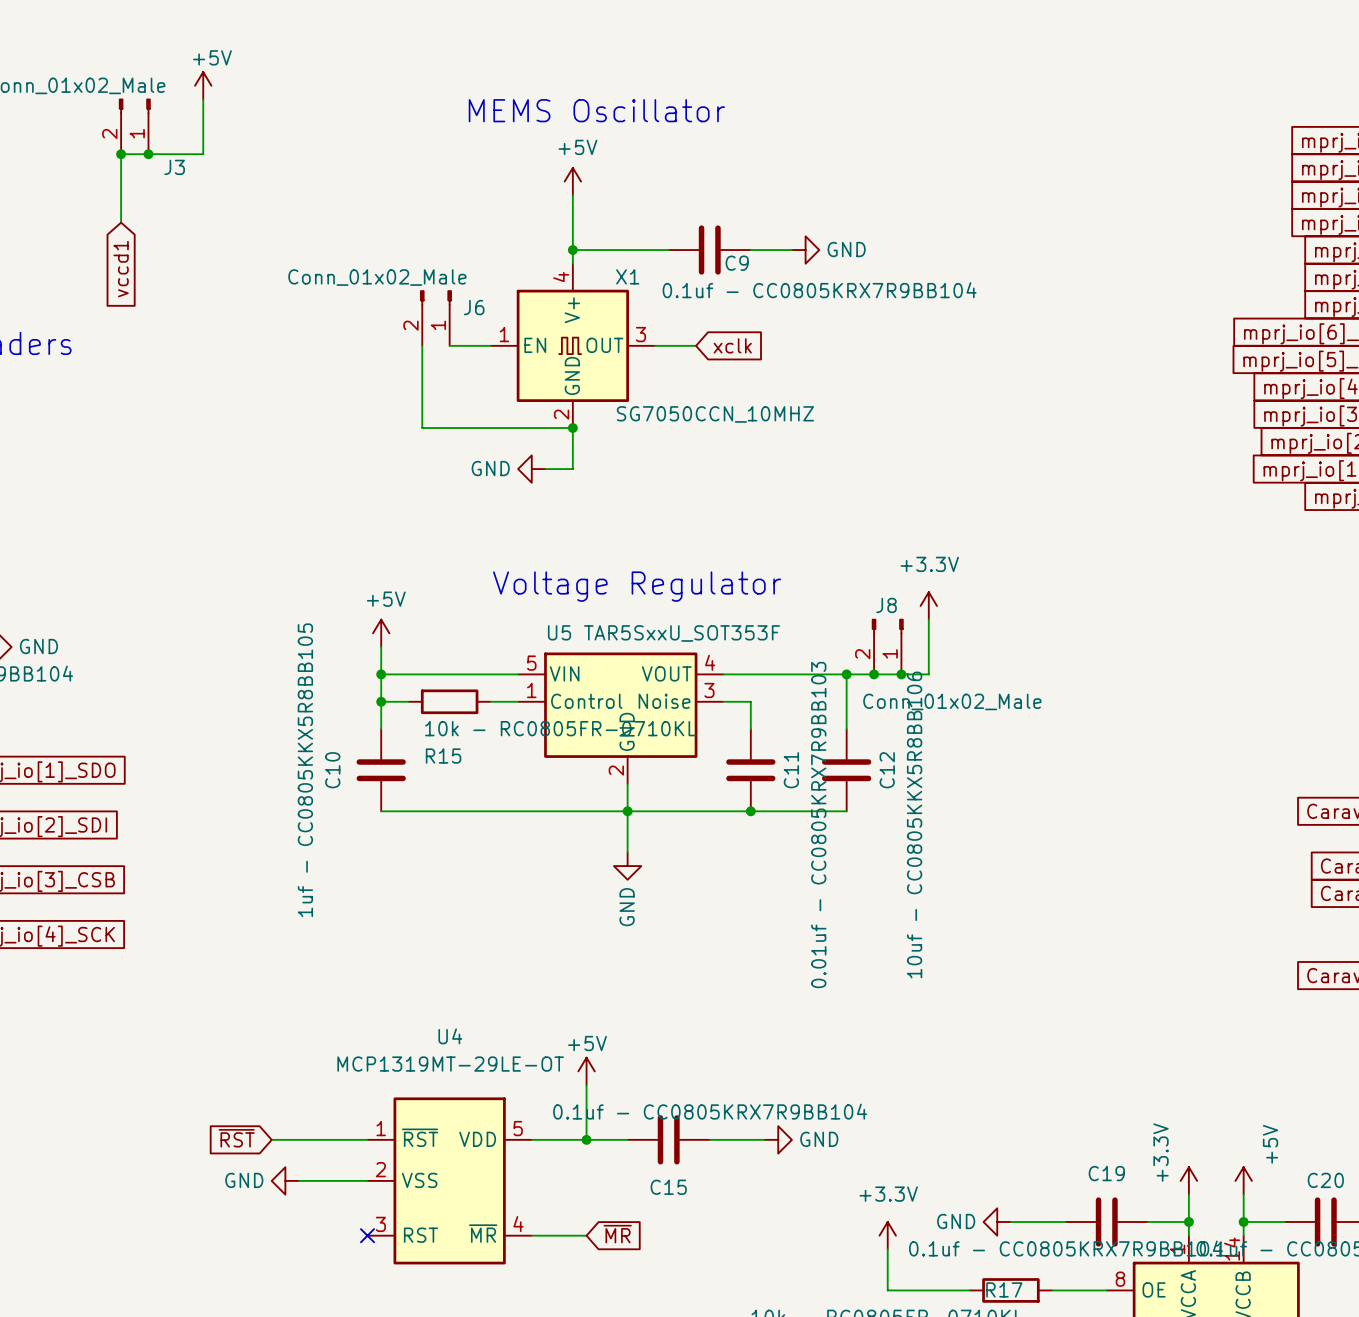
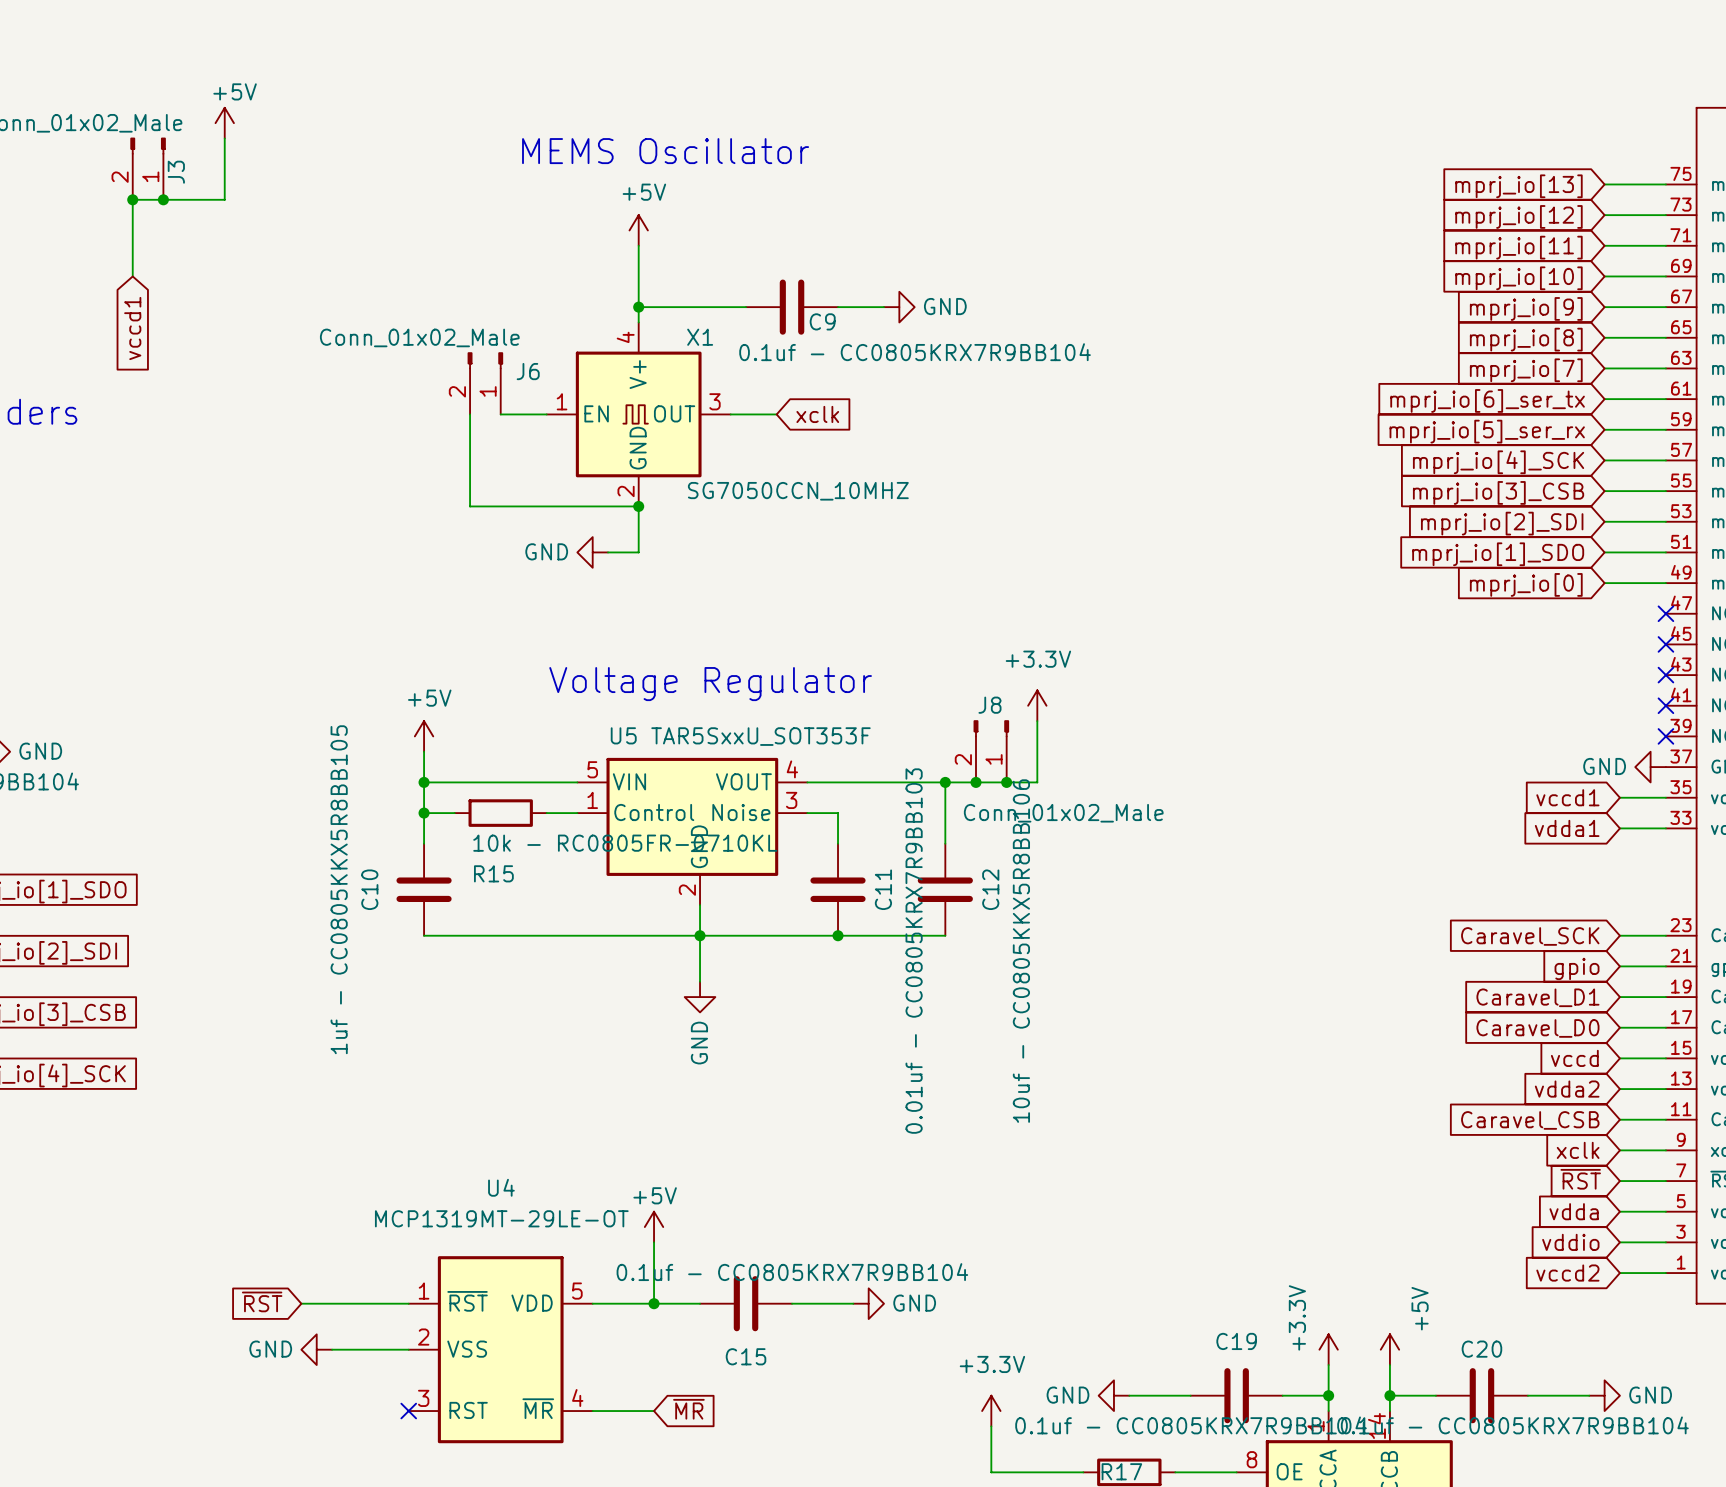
J3 name rotation: 0° (174, 167) -> 90° counterclockwise (176, 172)
J3 name position: J3 (174, 167) -> J3 (176, 172)

